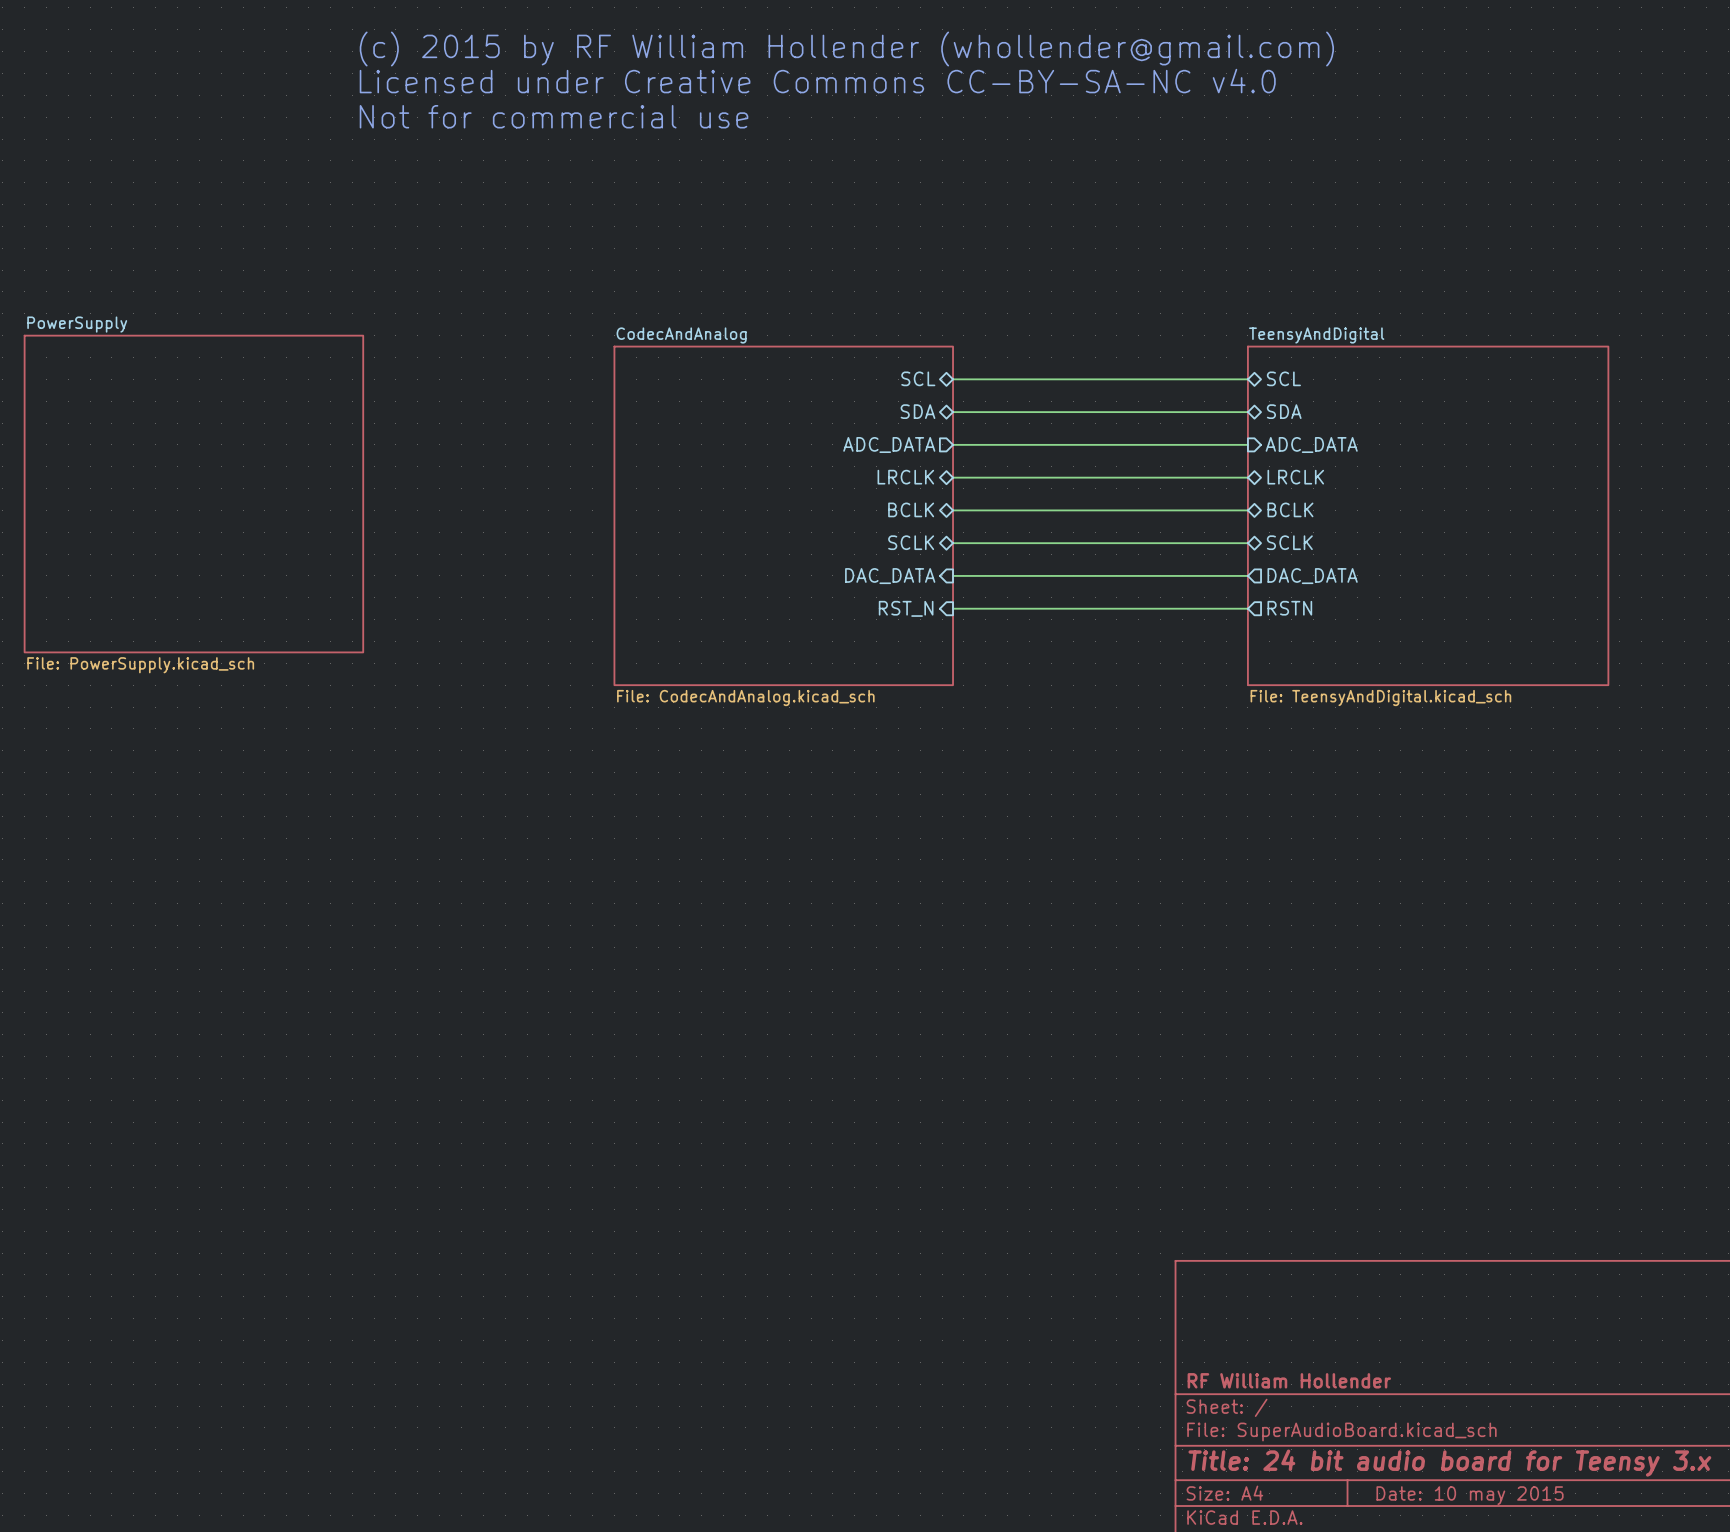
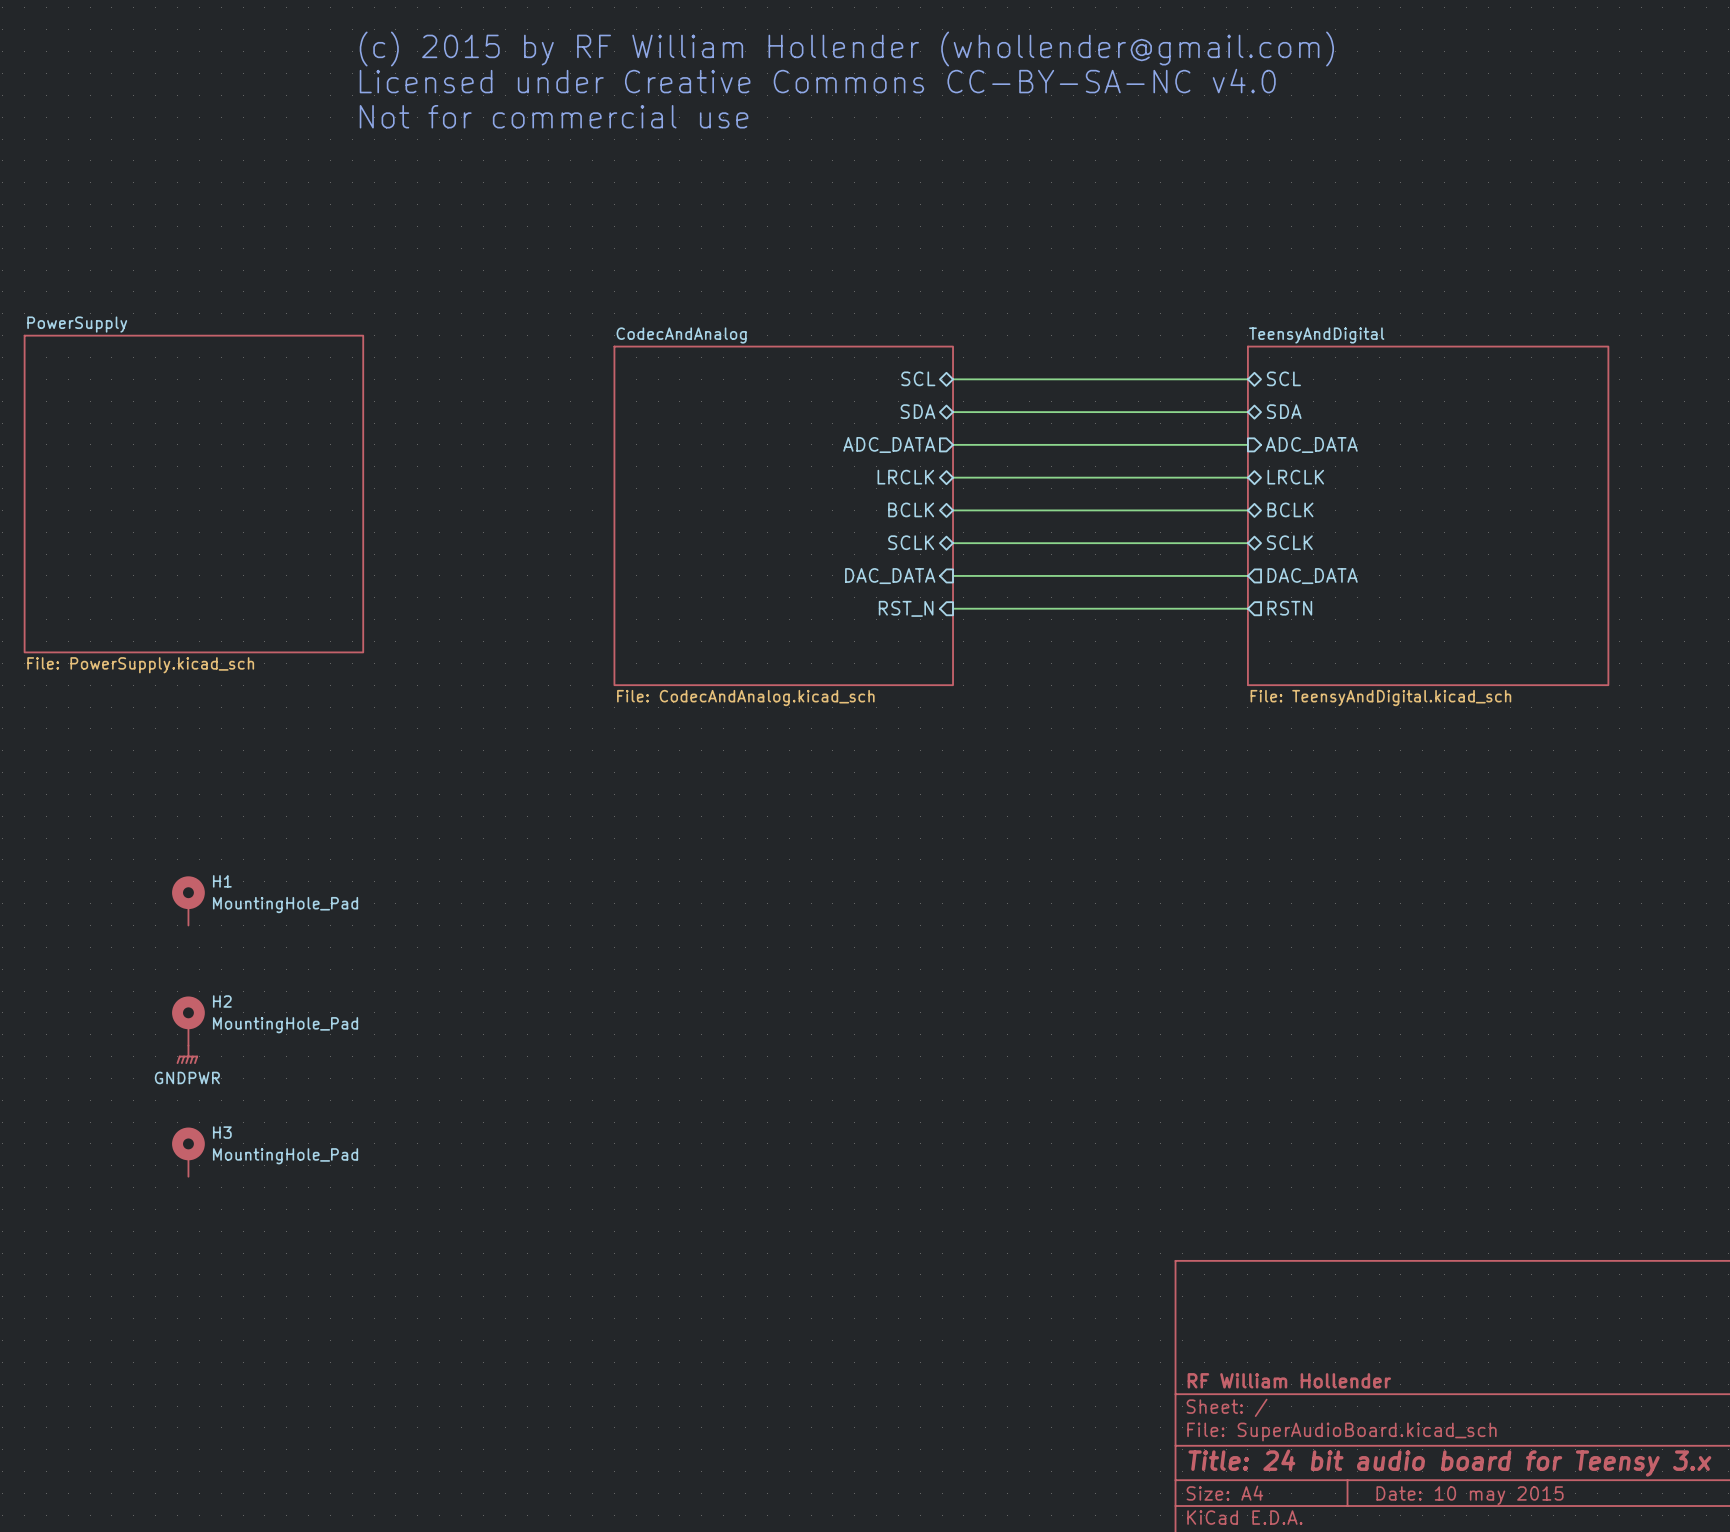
H1: none -> MountingHole_Pad (188, 900)
H2: none -> MountingHole_Pad (188, 1021)
power symbol: none -> GNDPWR (187, 1054)
H3: none -> MountingHole_Pad (188, 1152)

